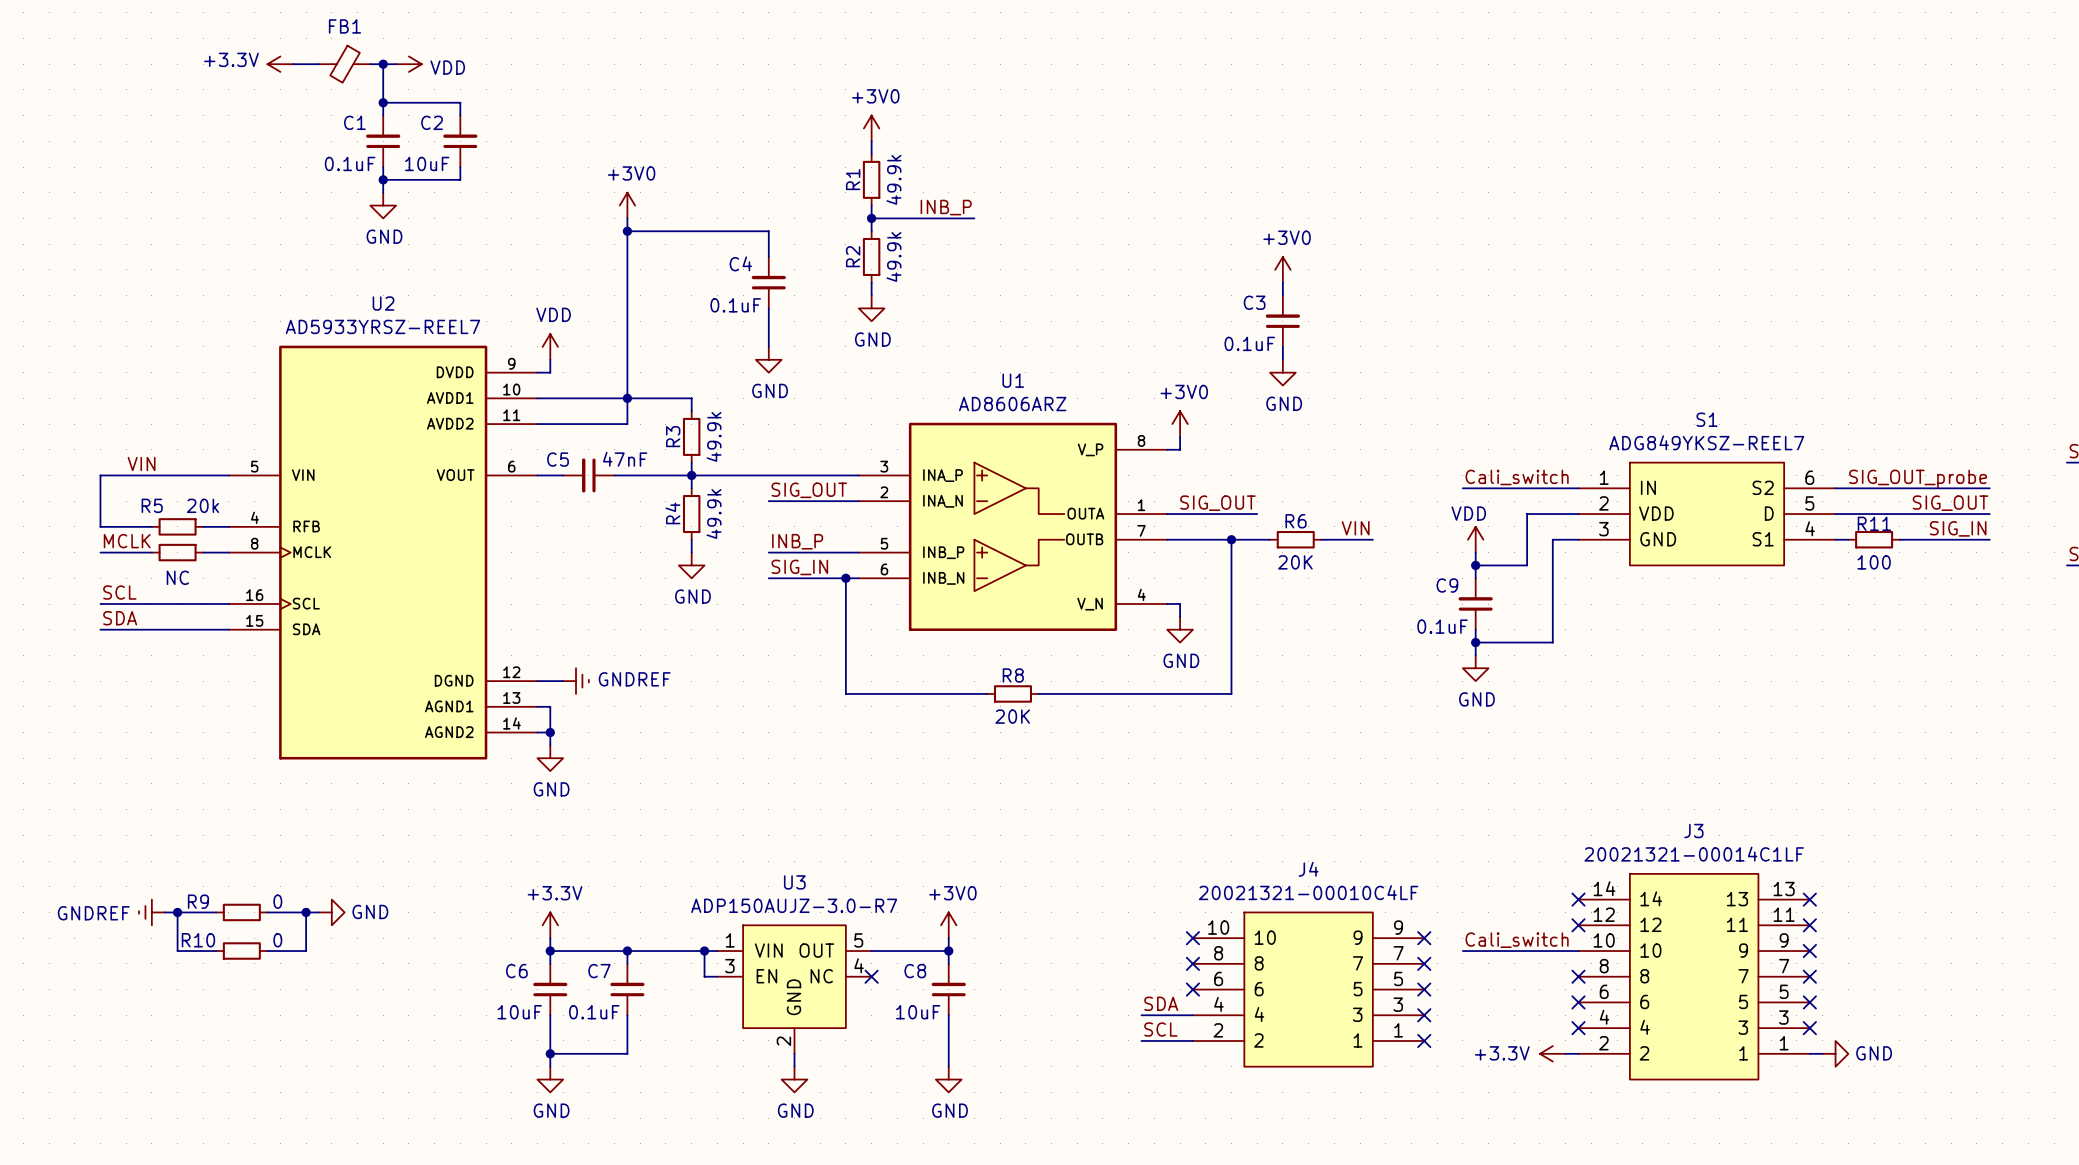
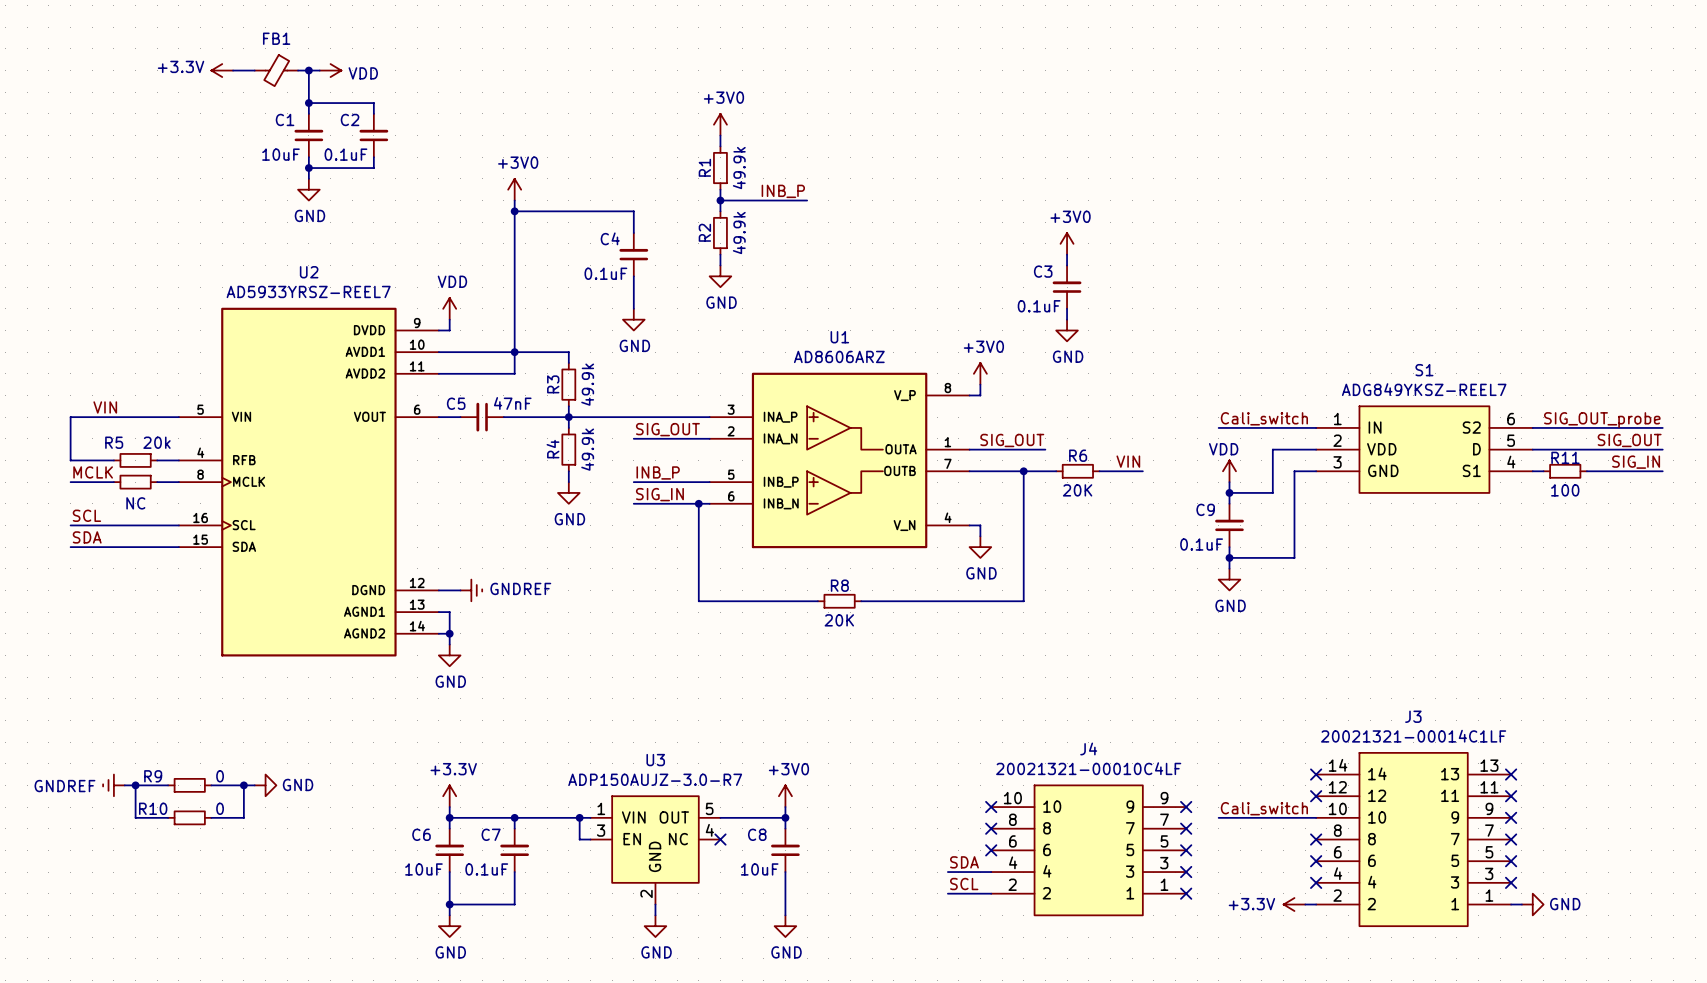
C1 value: 0.1uF (350, 163) -> 10uF (280, 154)
C2 value: 10uF (427, 163) -> 0.1uF (345, 154)

